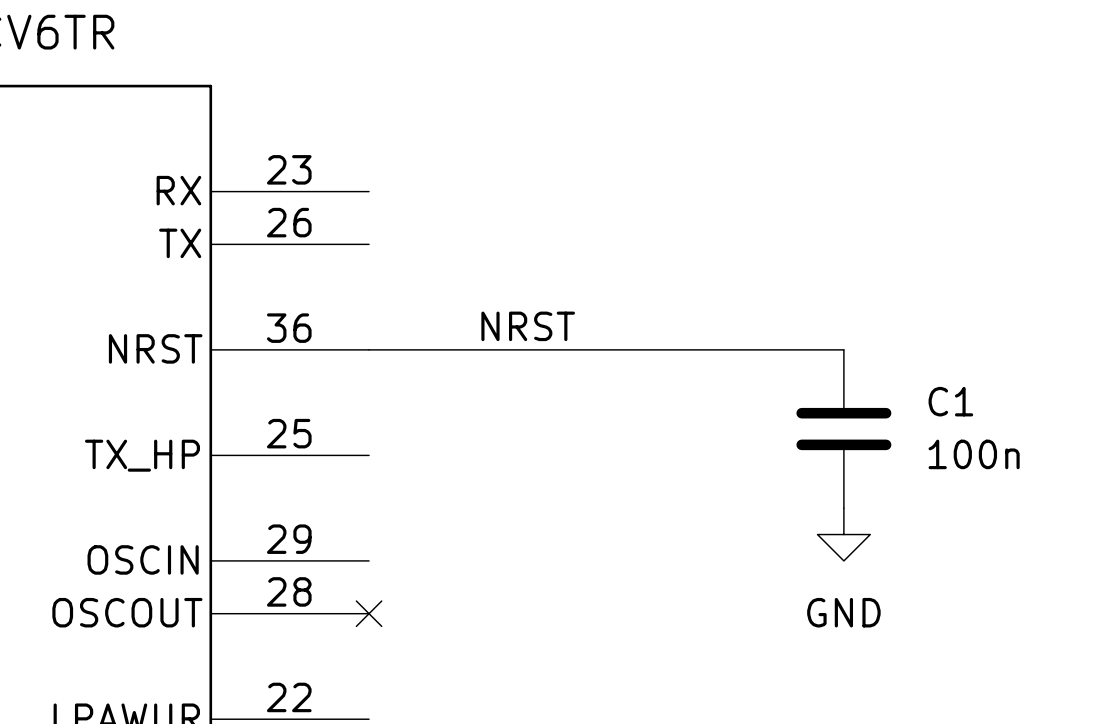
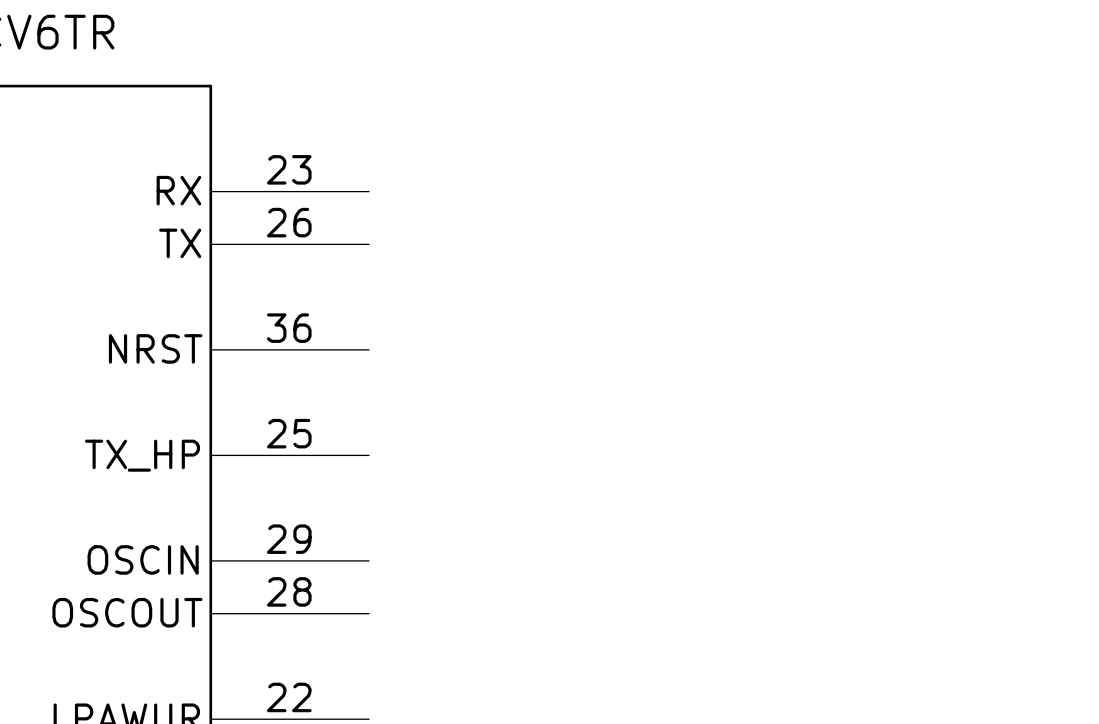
label: NRST (528, 326) -> none
wire: (369, 349) (843, 349) -> none
C1: 100n (843, 429) -> none
power symbol: GND (843, 534) -> none
no-connect mark: (369, 613) -> none

